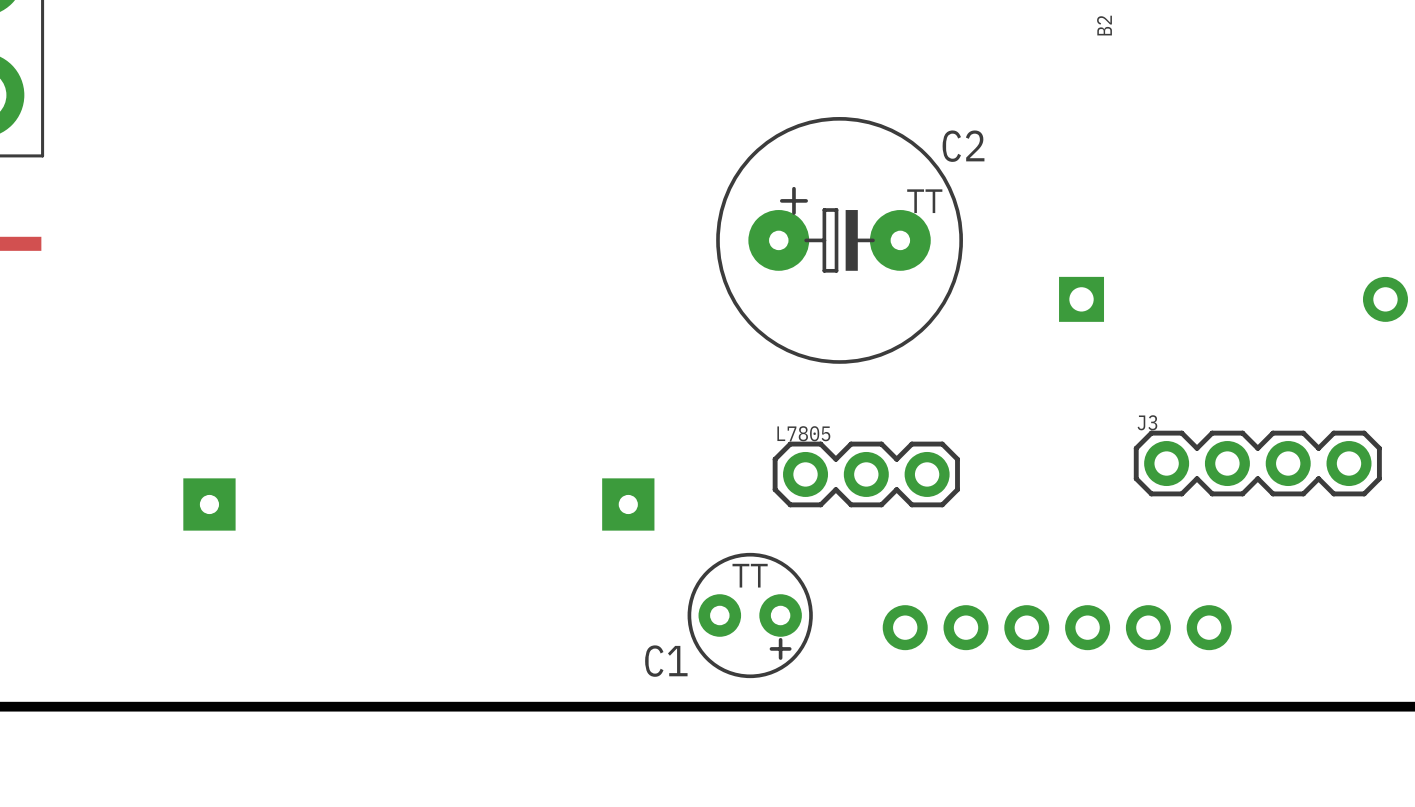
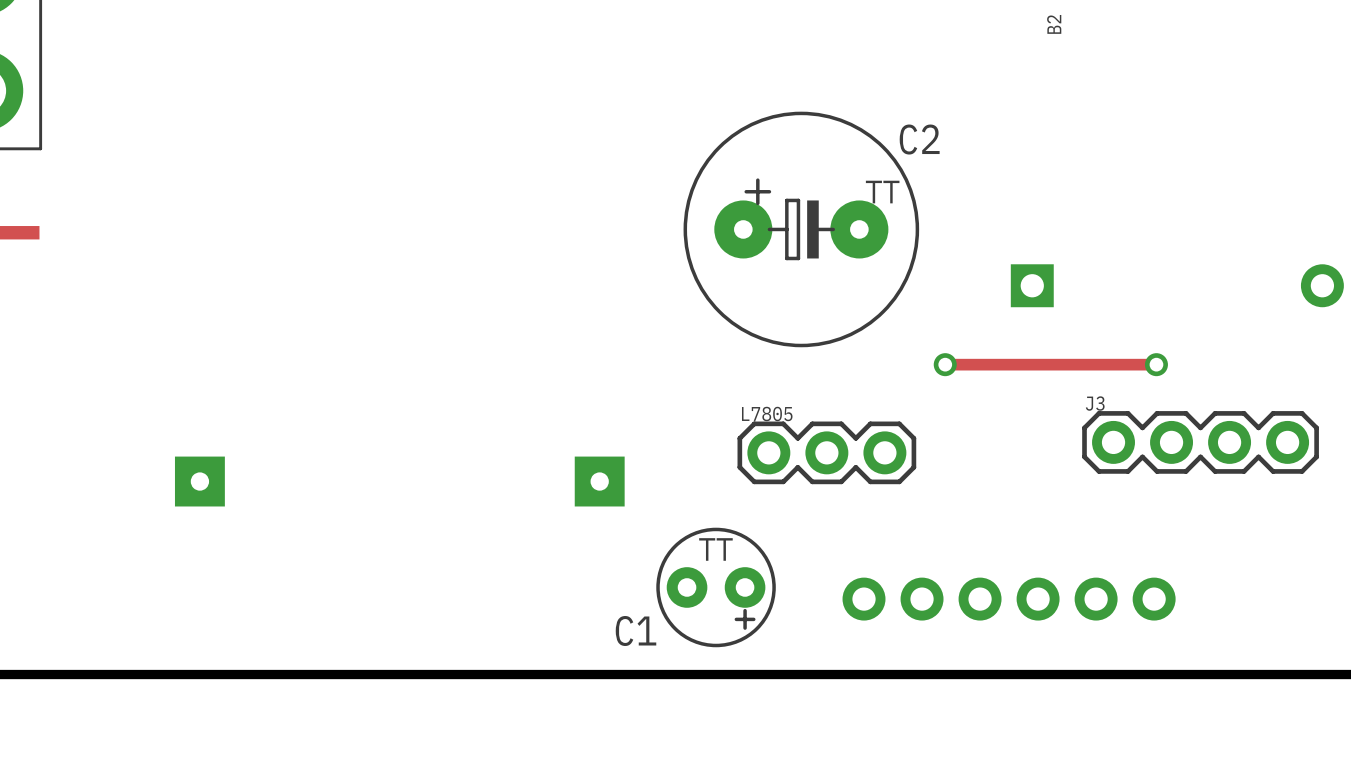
track: none -> (945, 364) (1156, 364)
via: none -> (945, 364)
via: none -> (1156, 364)

